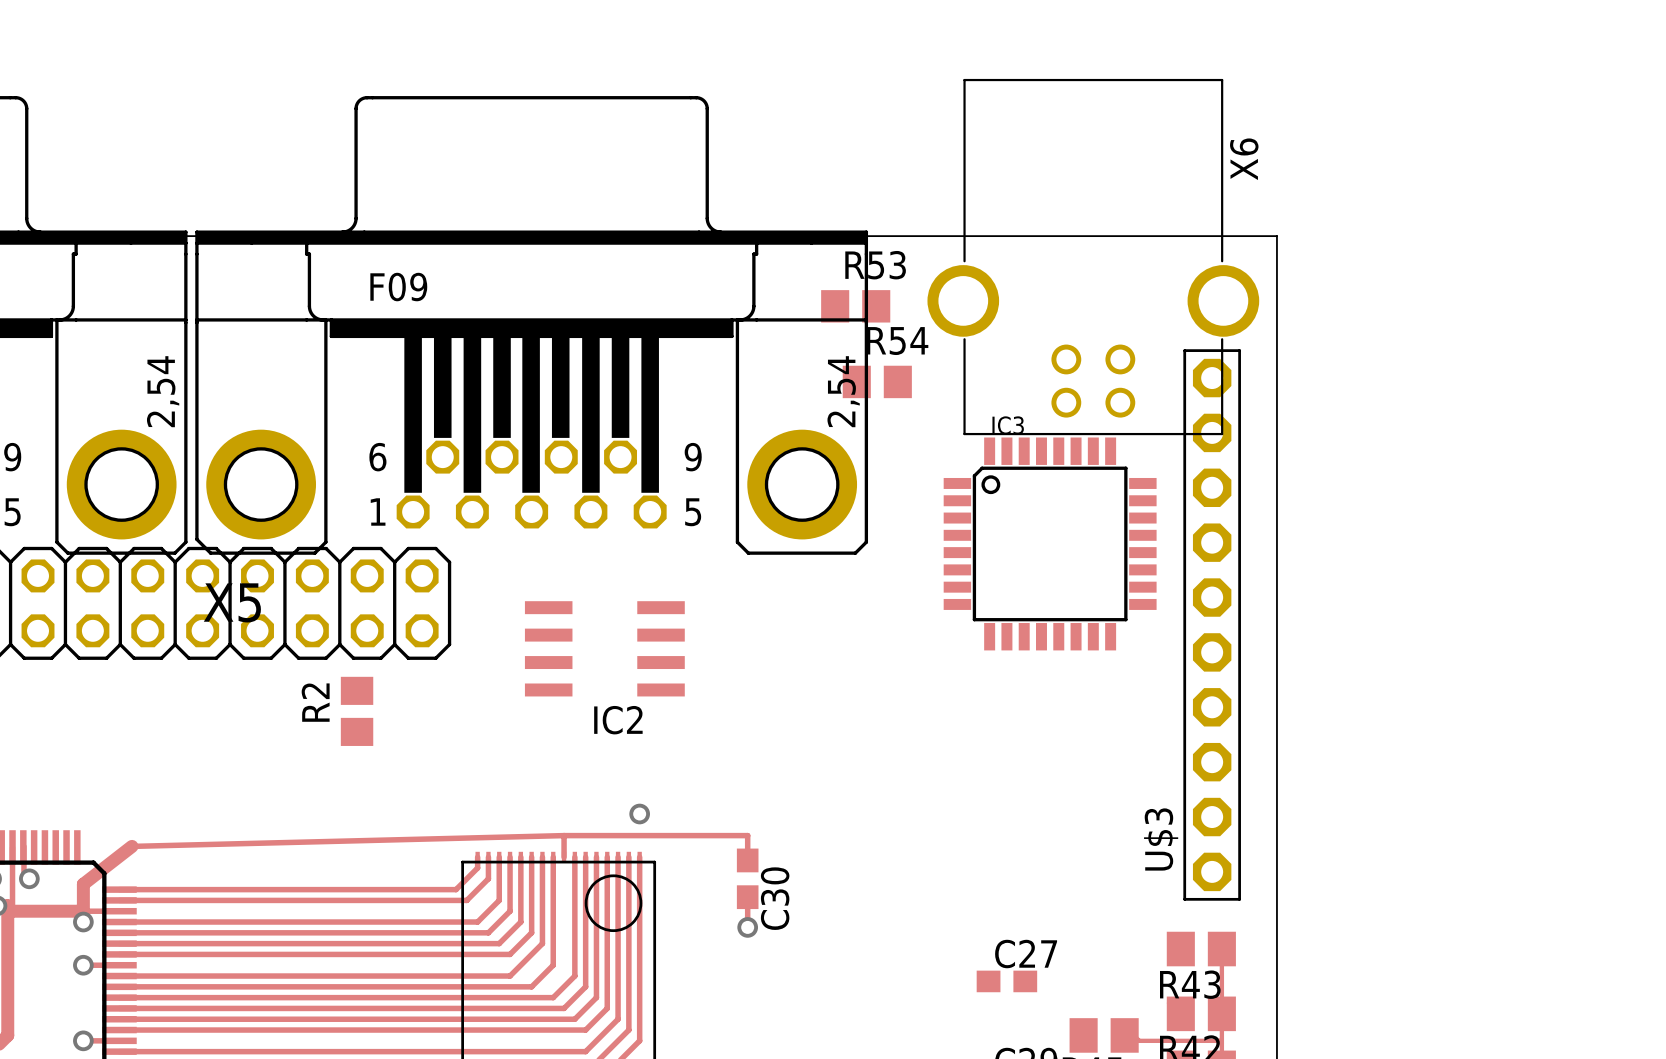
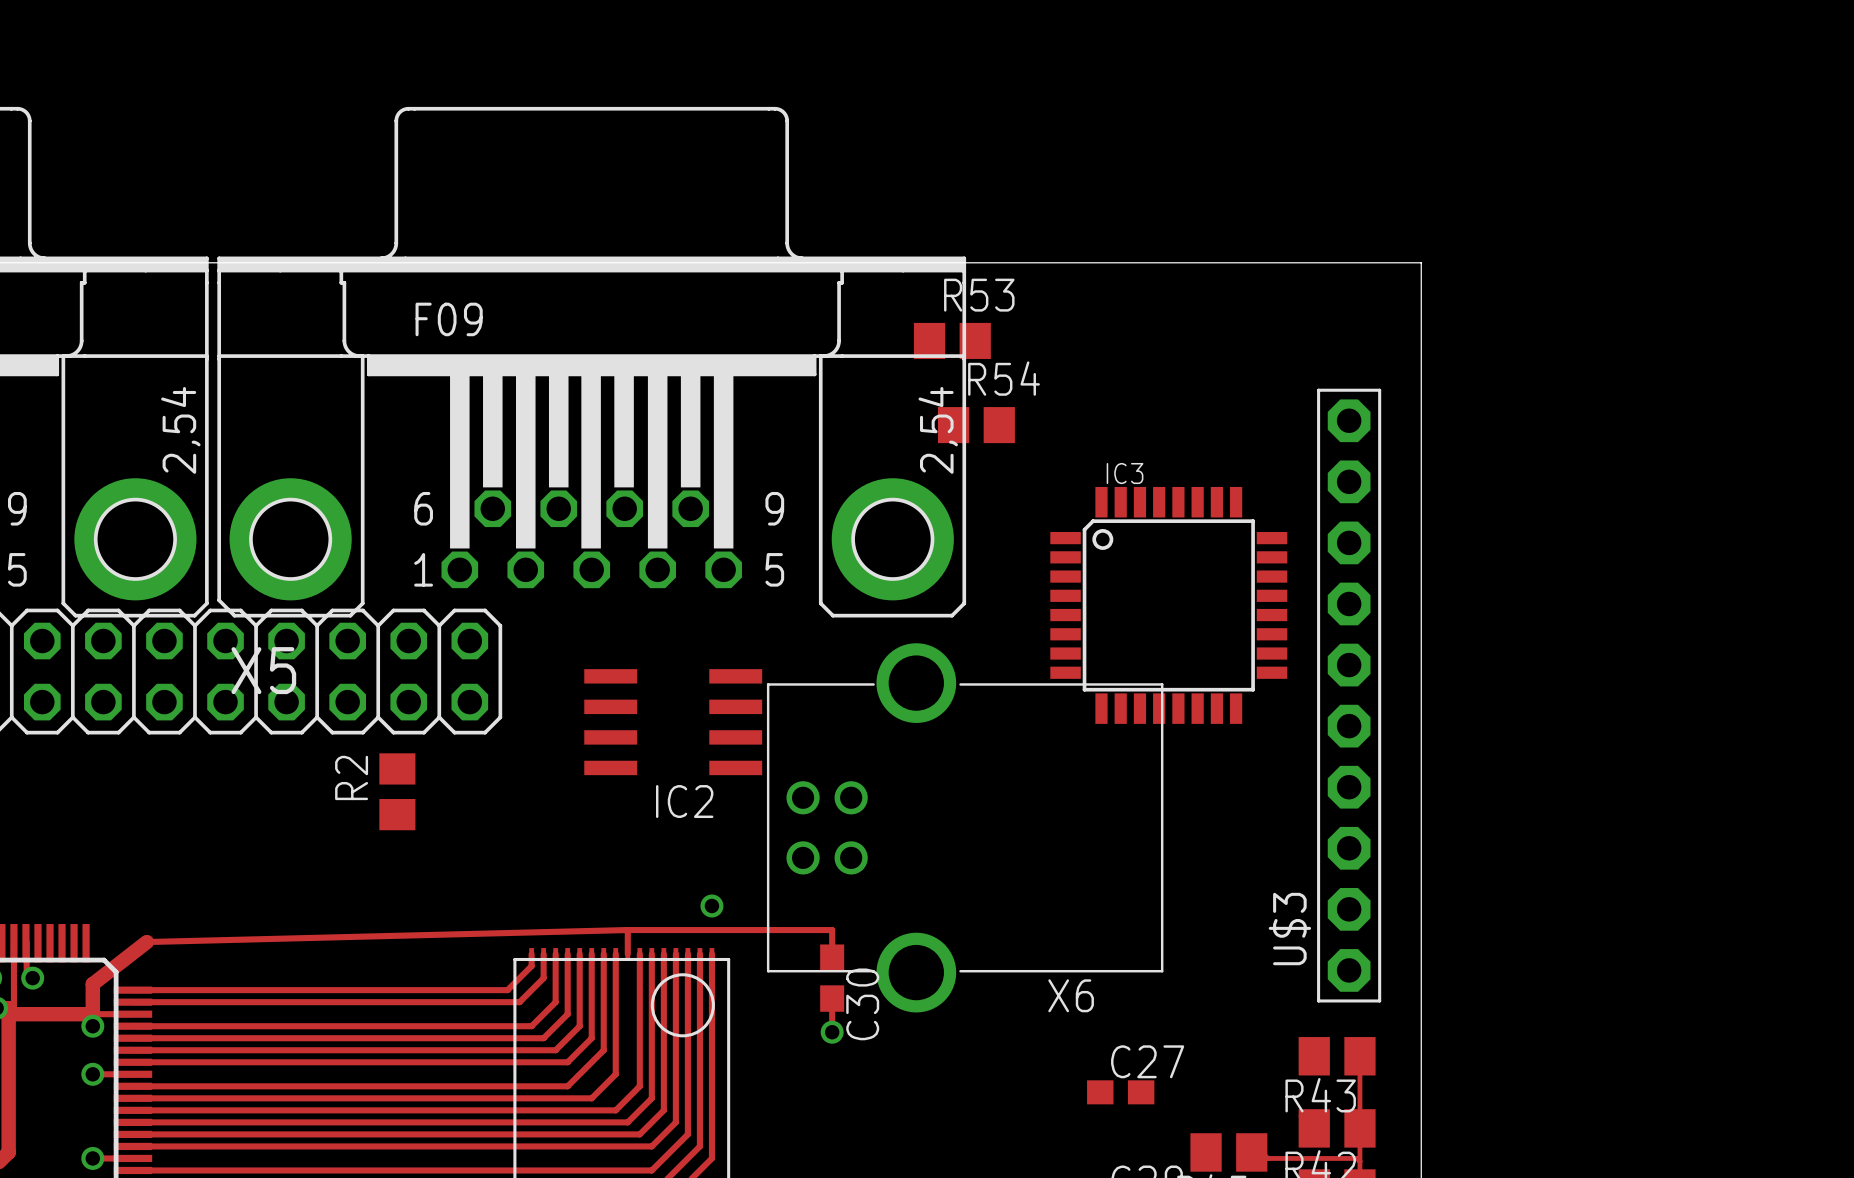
X6 rotation: 0° (1093, 257) -> 90° clockwise (965, 827)
X6 position: (1093, 257) -> (965, 827)

